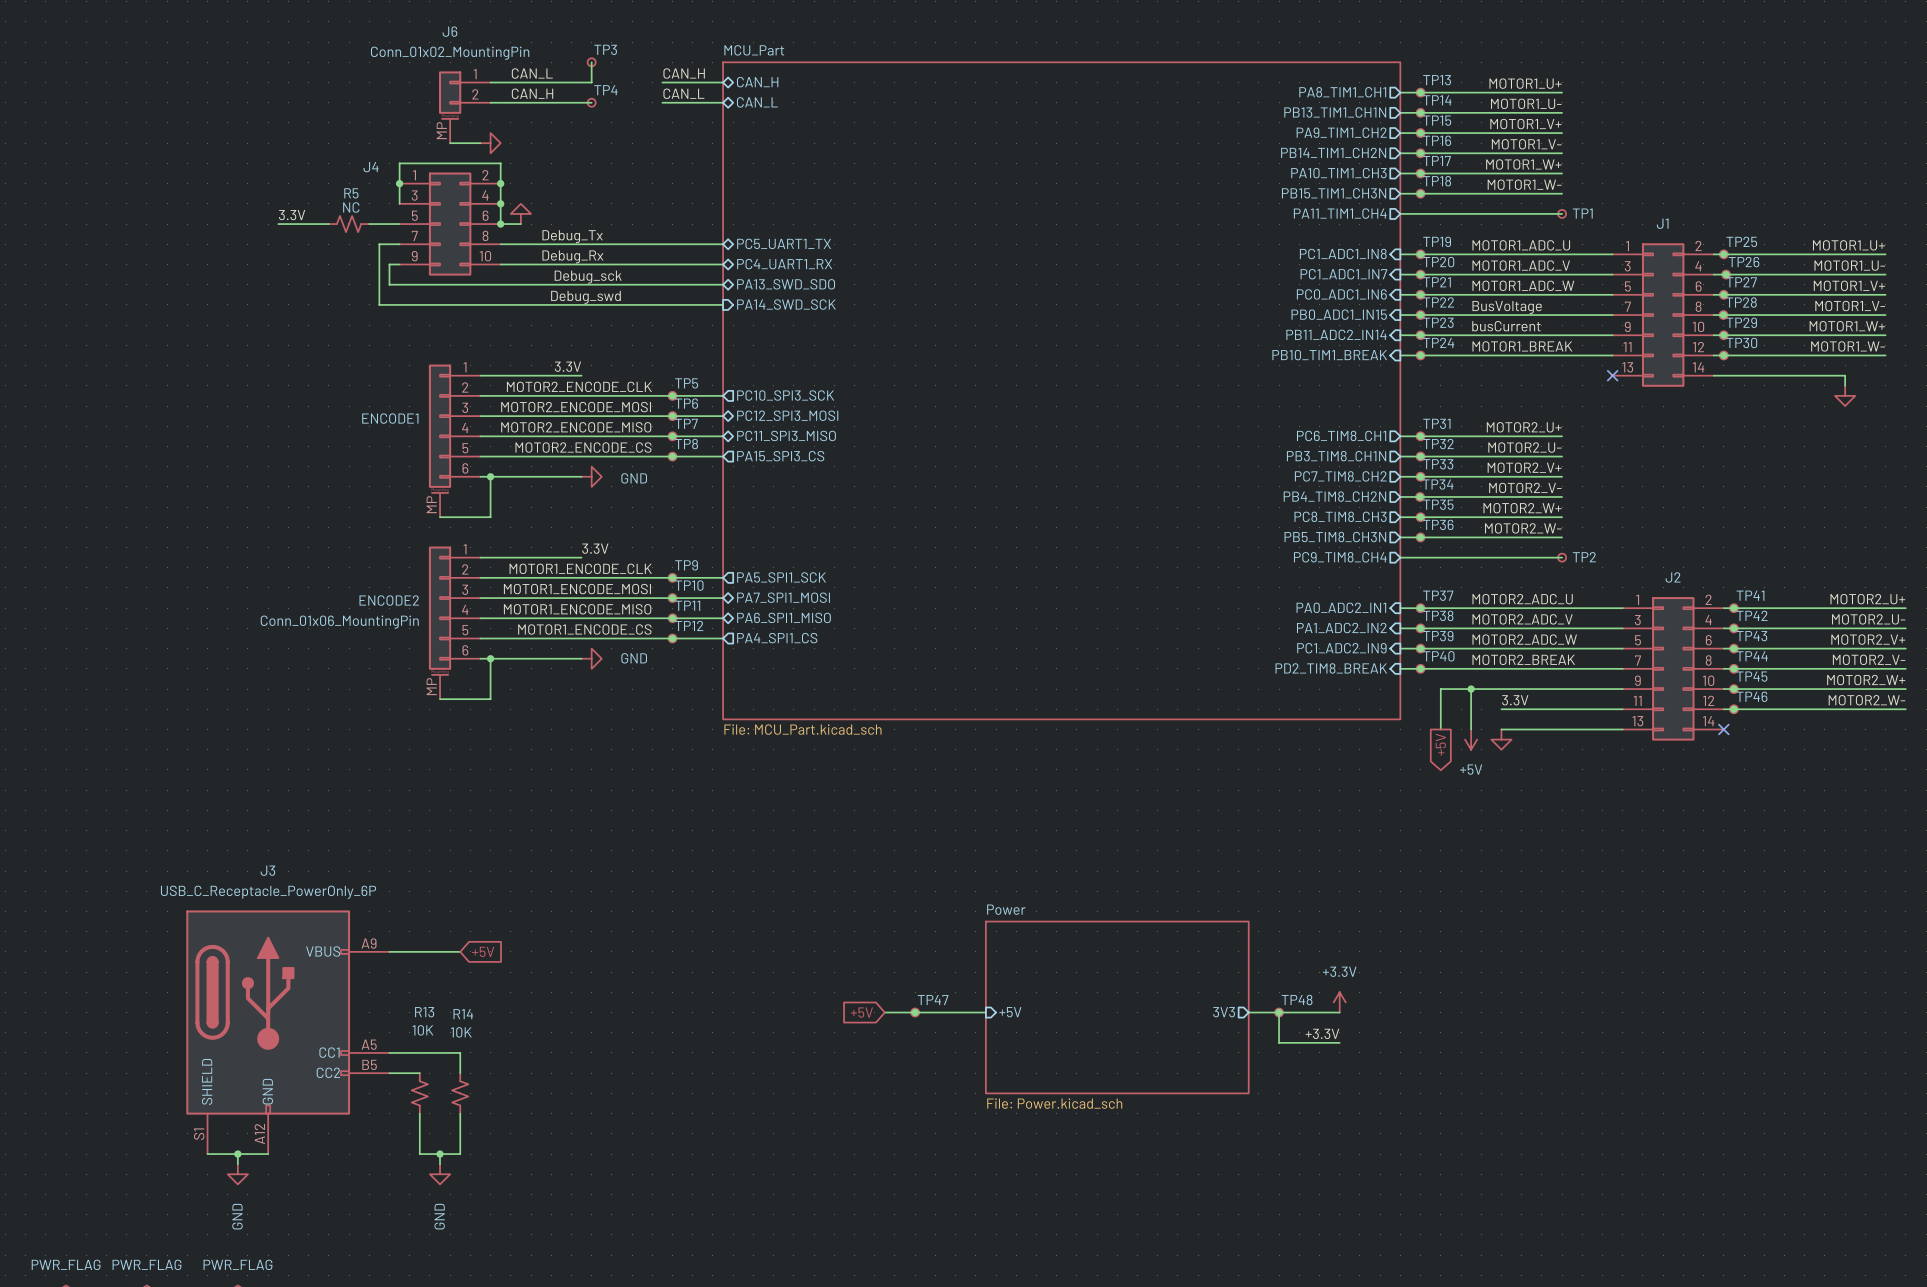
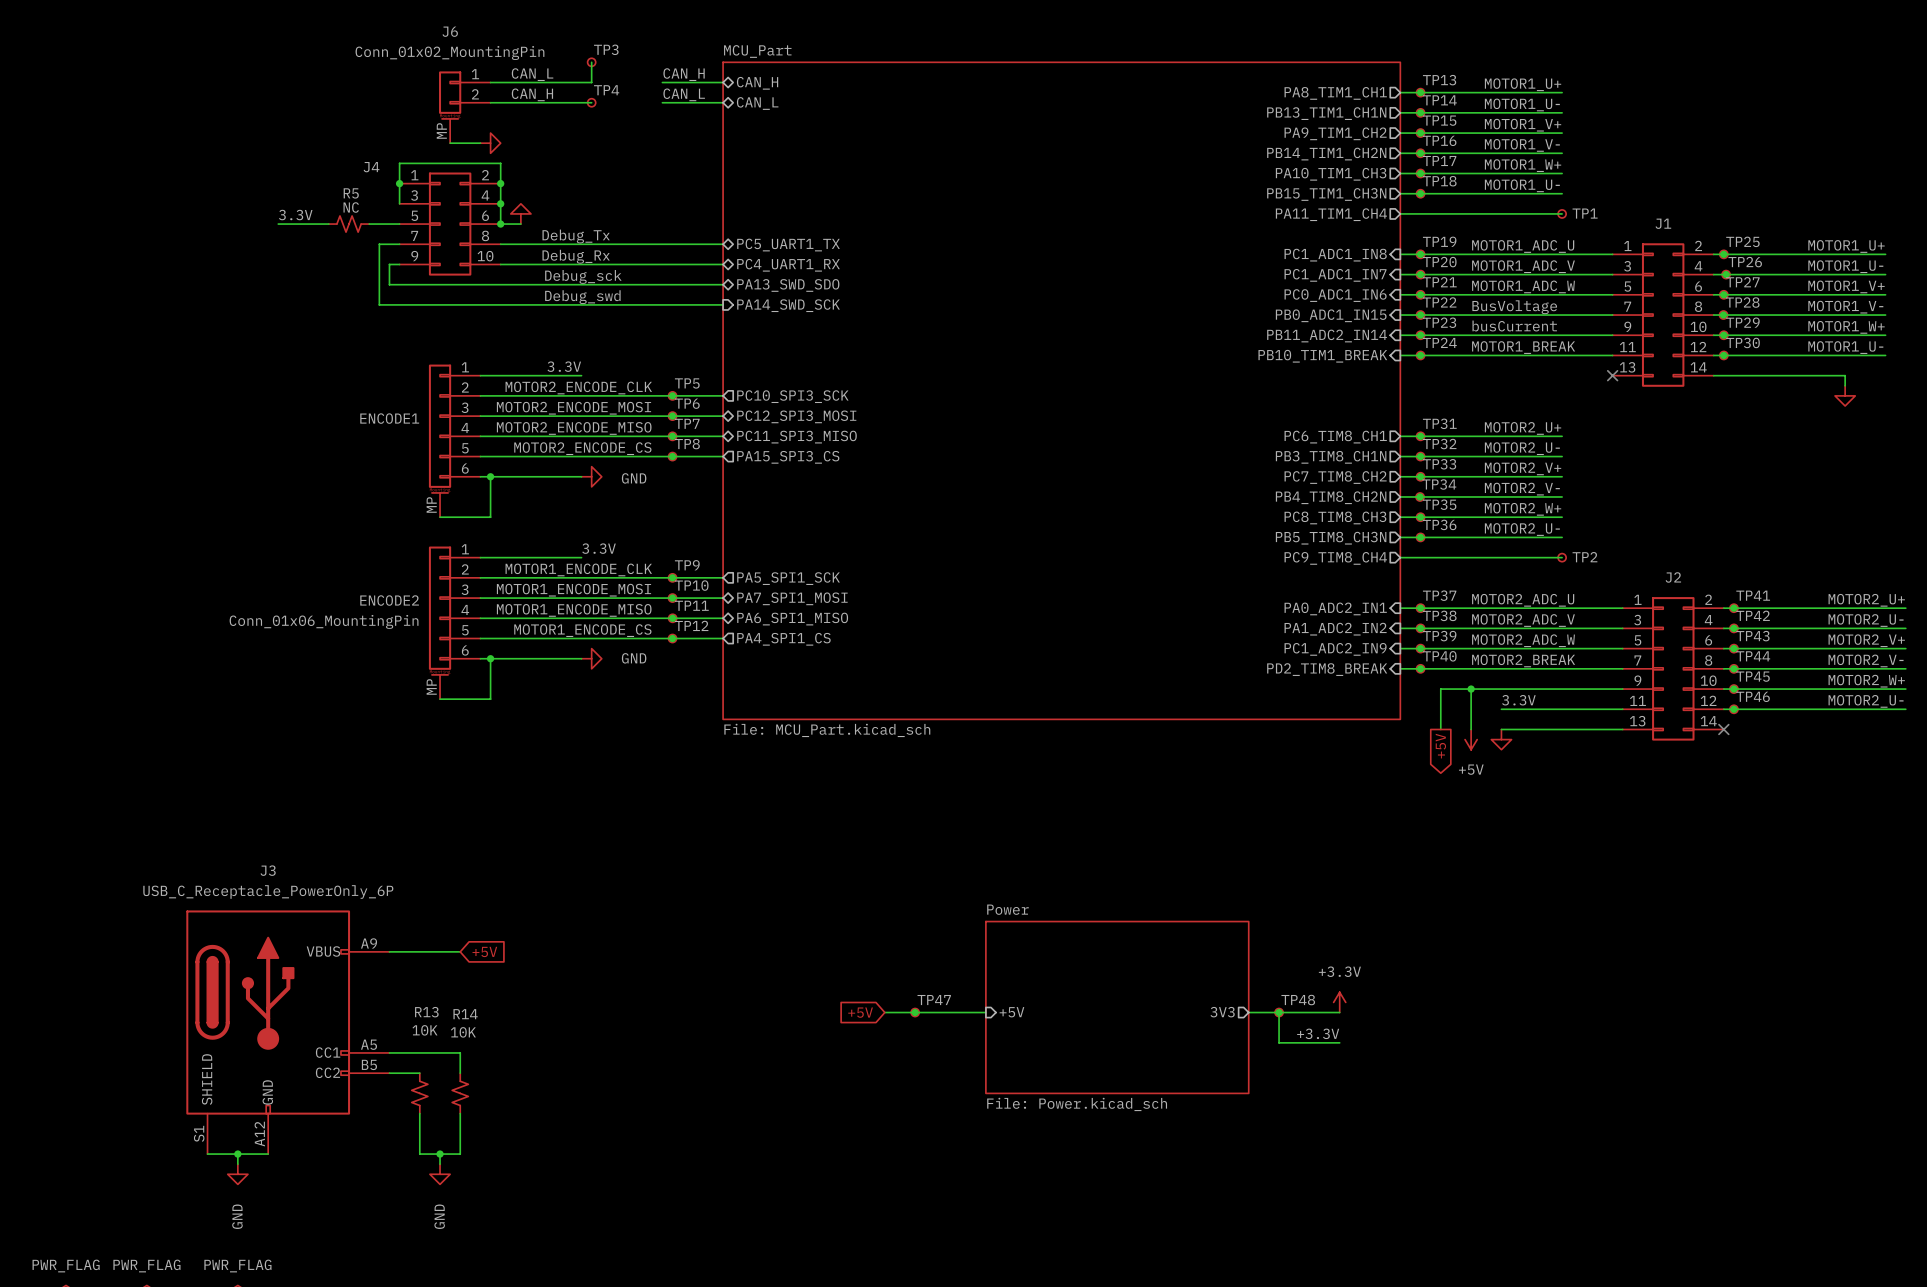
label: MOTOR1_W- (1524, 184) -> MOTOR1_U- (1522, 185)
label: MOTOR1_W- (1848, 346) -> MOTOR1_U- (1845, 347)
label: MOTOR2_W- (1523, 528) -> MOTOR2_U- (1522, 529)
label: MOTOR2_W- (1866, 700) -> MOTOR2_U- (1866, 701)

